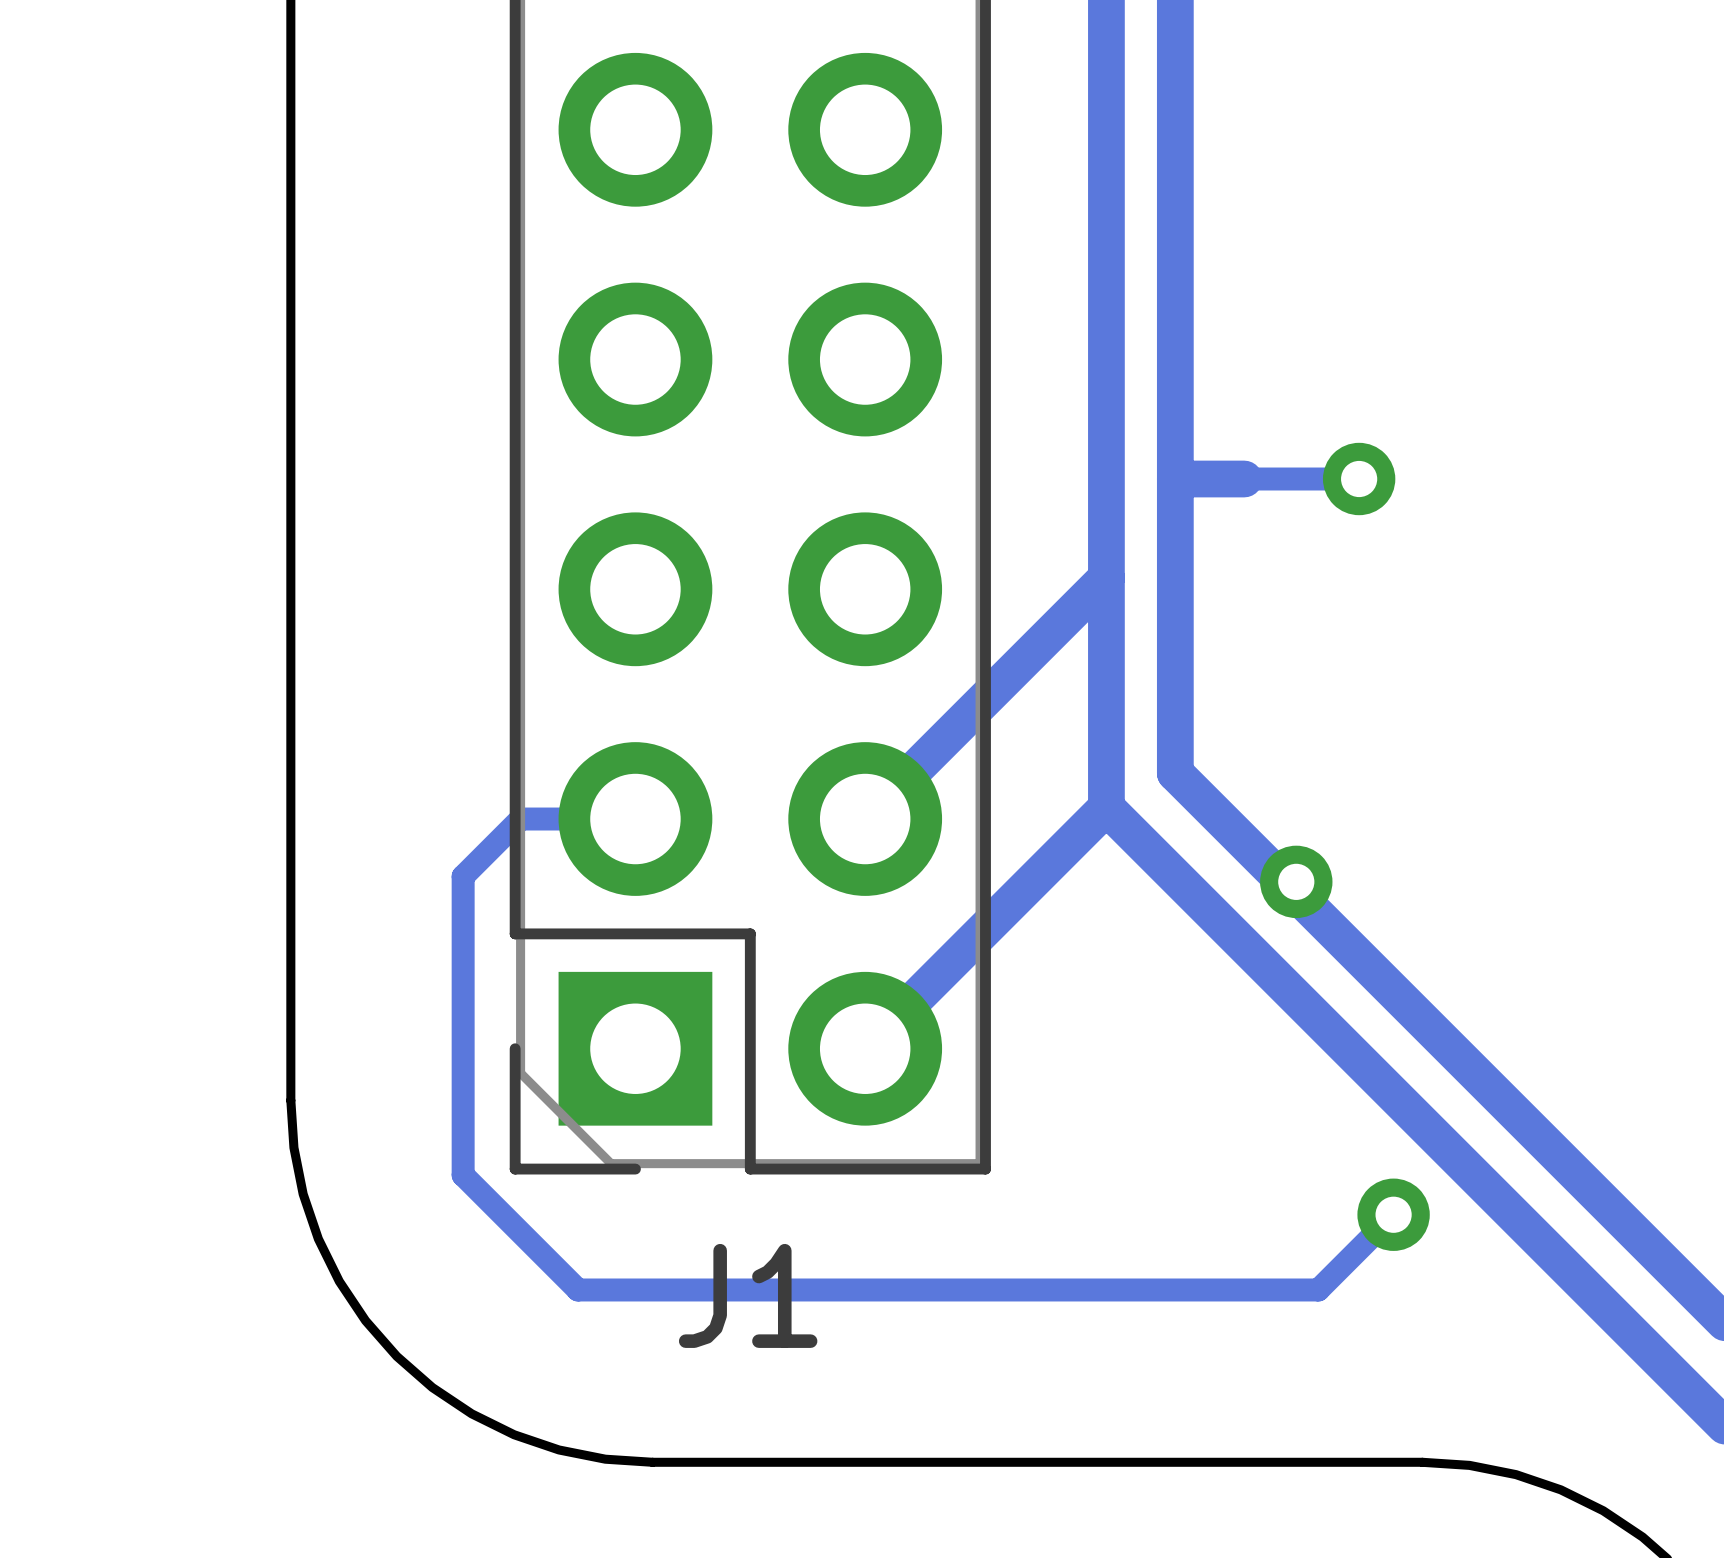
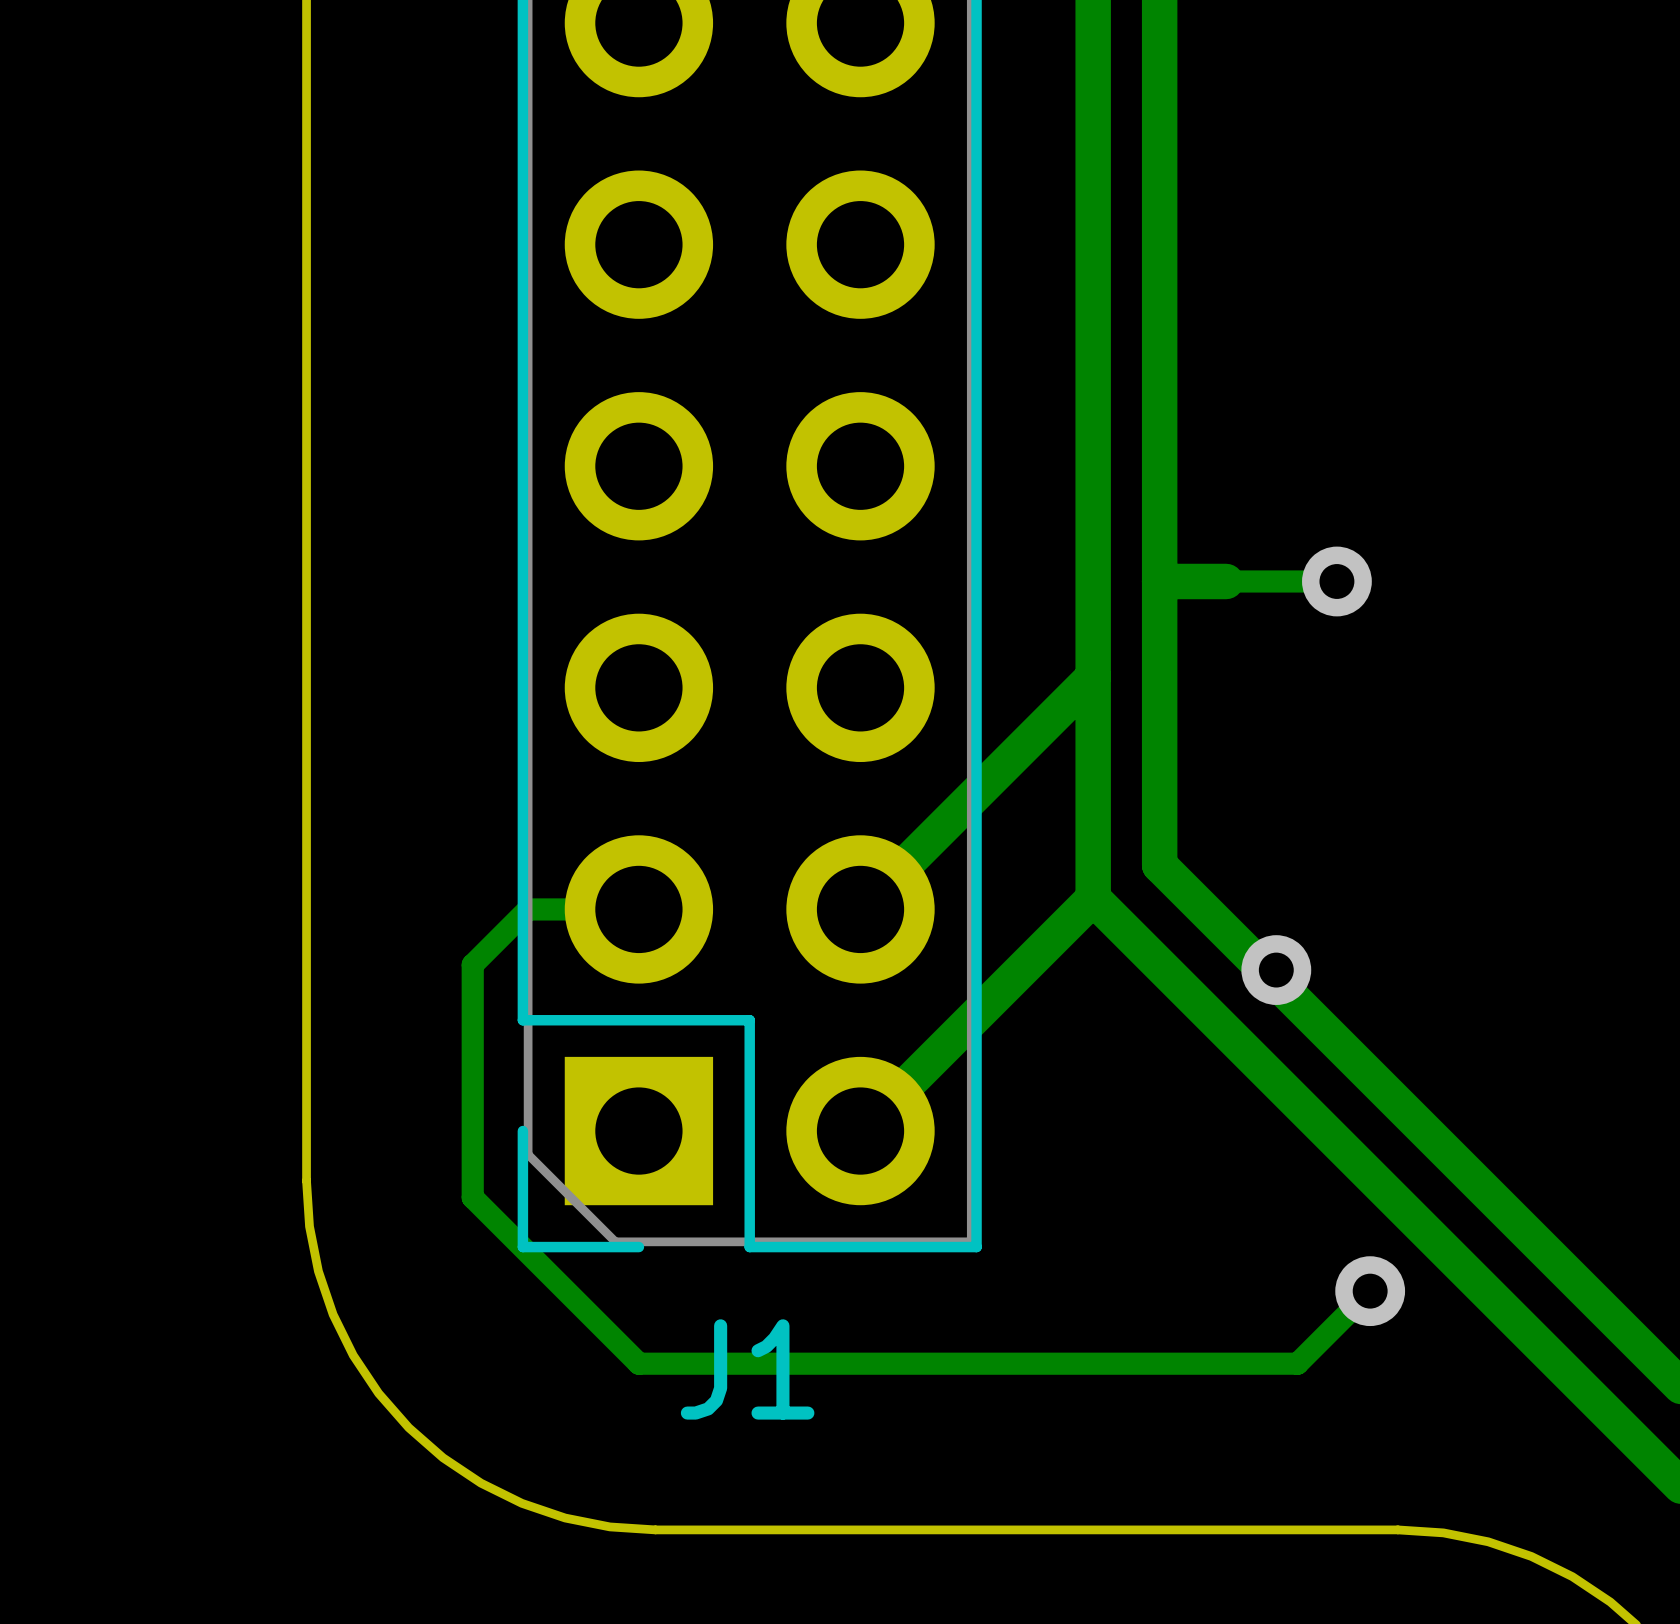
track: (463, 1117) (463, 1175) (578, 1289) (635, 1289) -> (472, 1197) (638, 1363)

